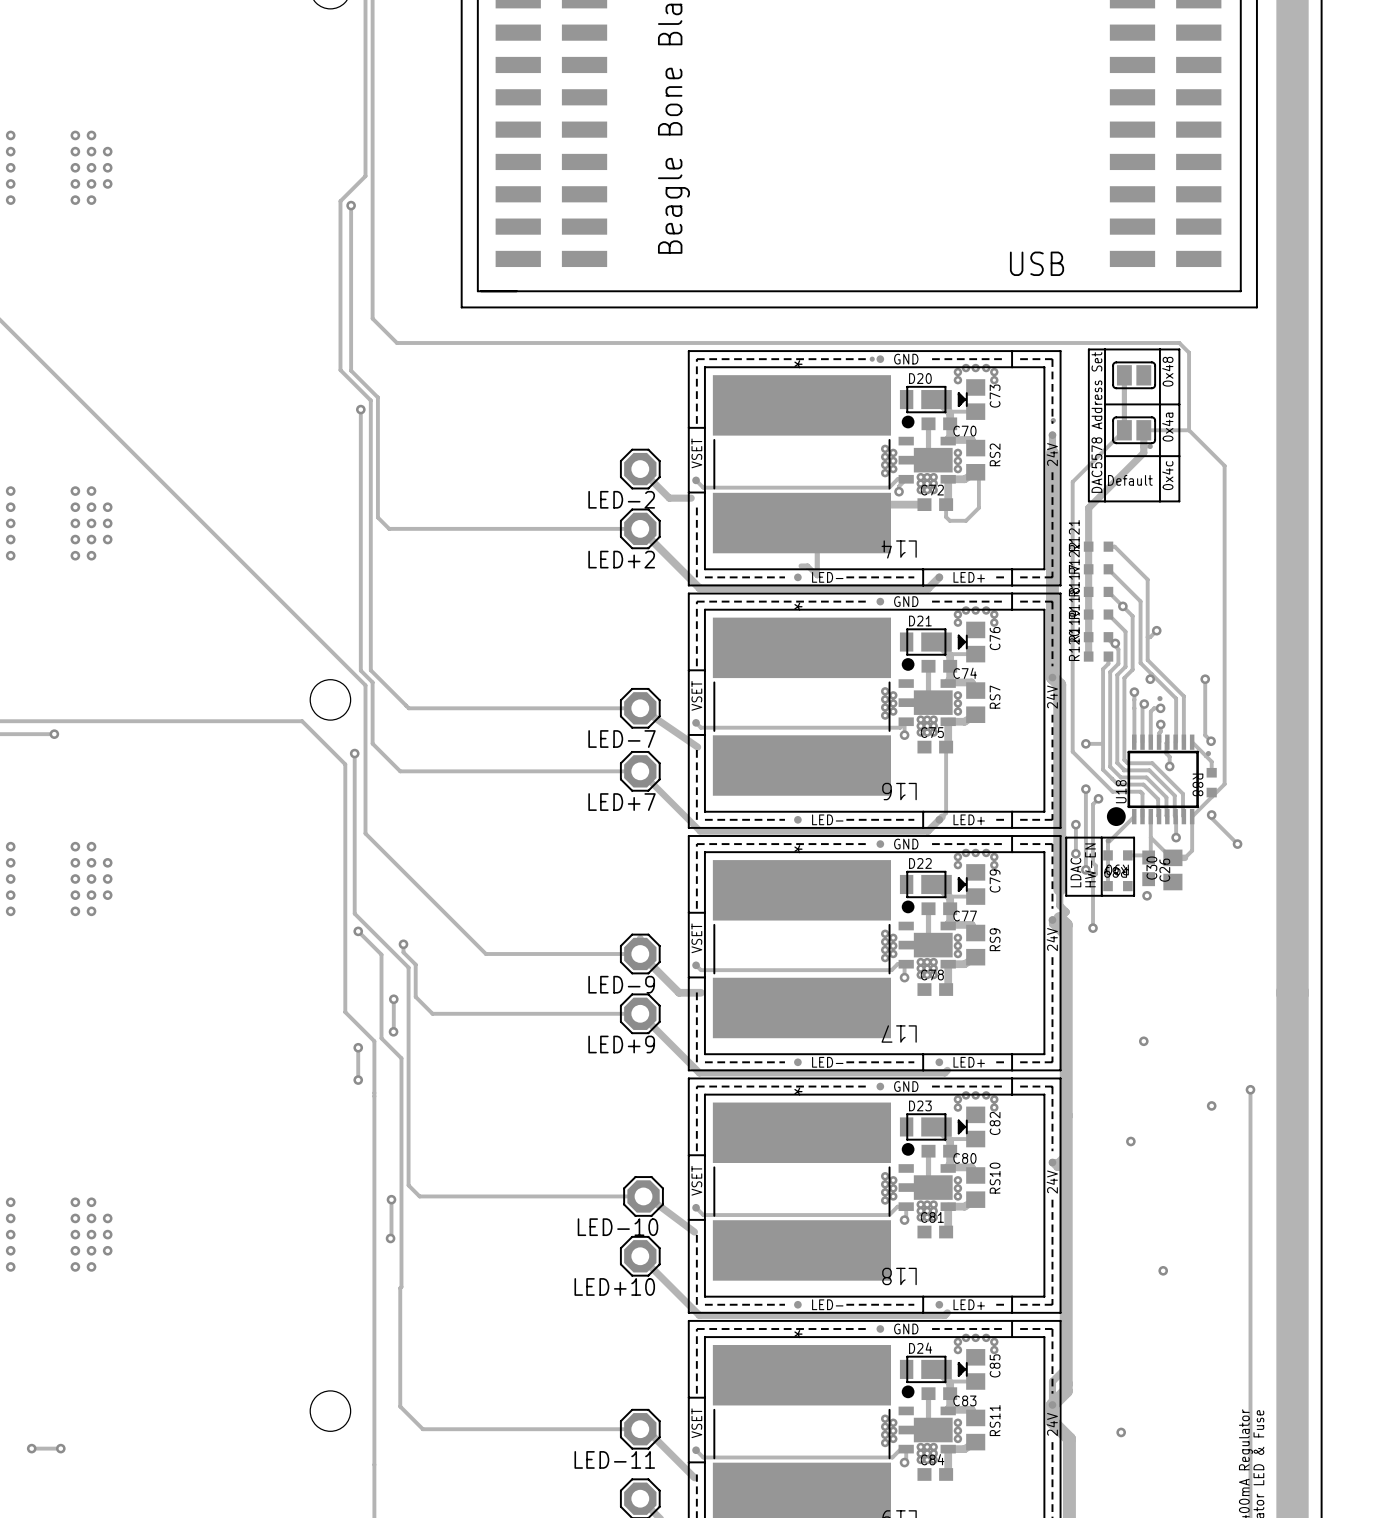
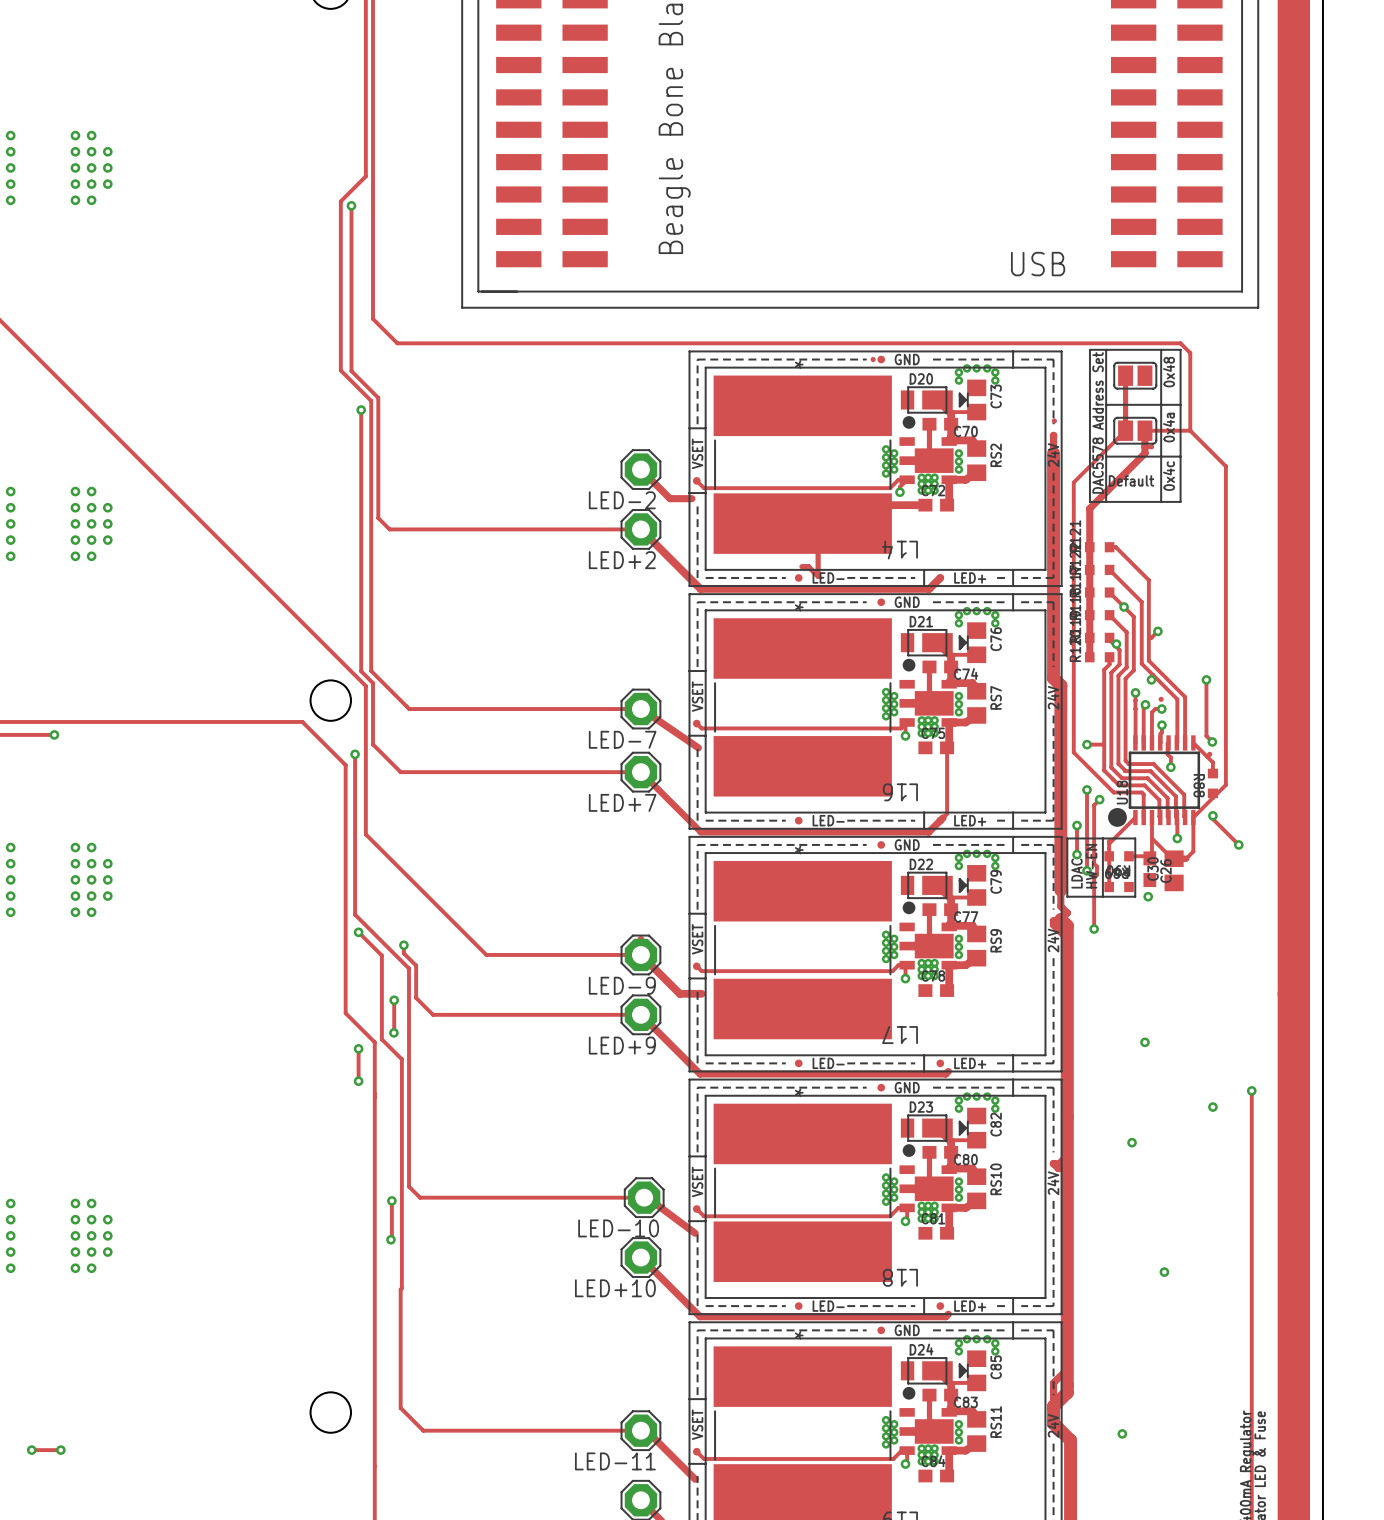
track: (975, 472) (978, 475) (978, 507) (966, 520) (949, 520) (946, 517) (946, 504) -> none

